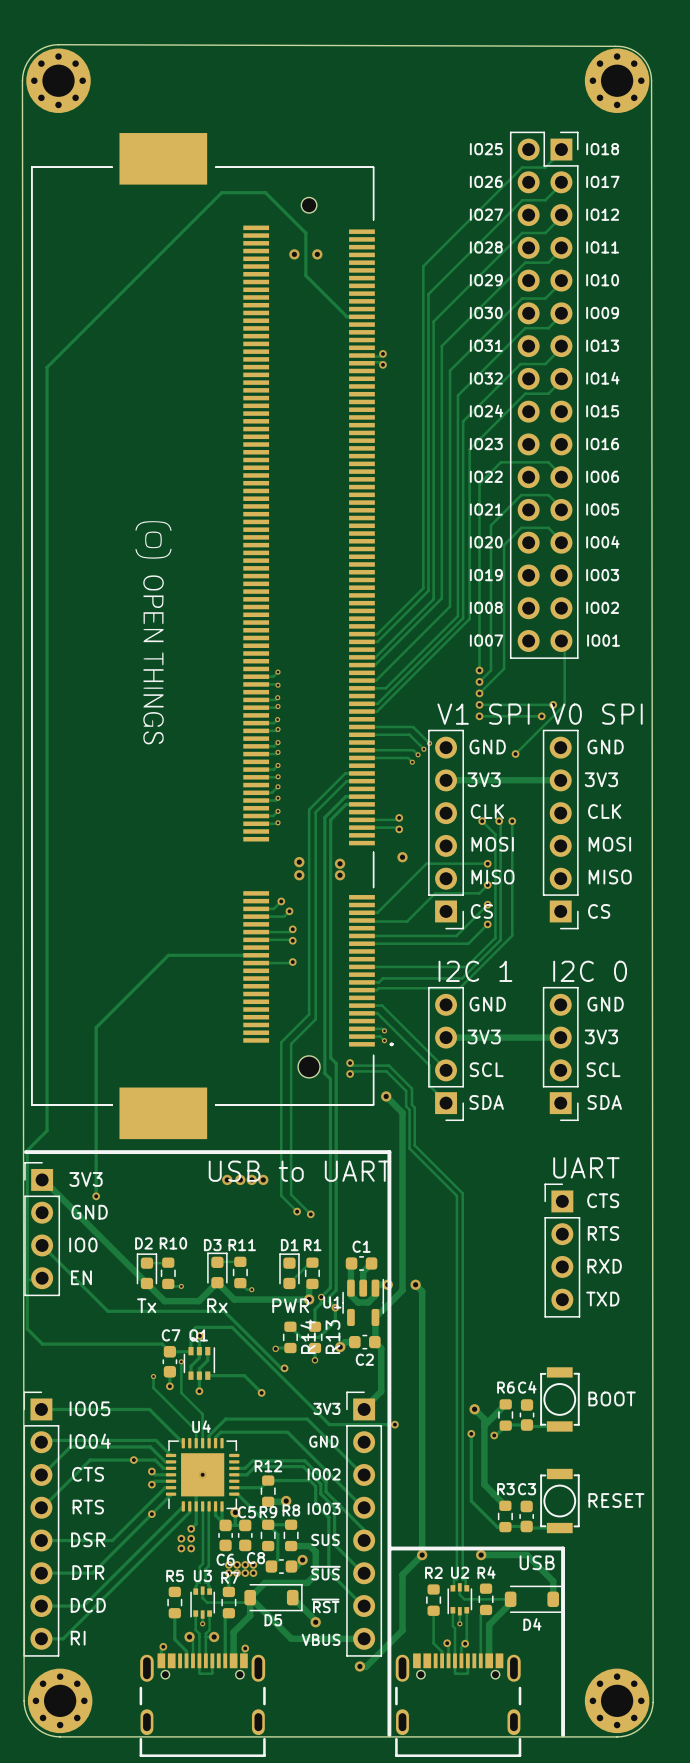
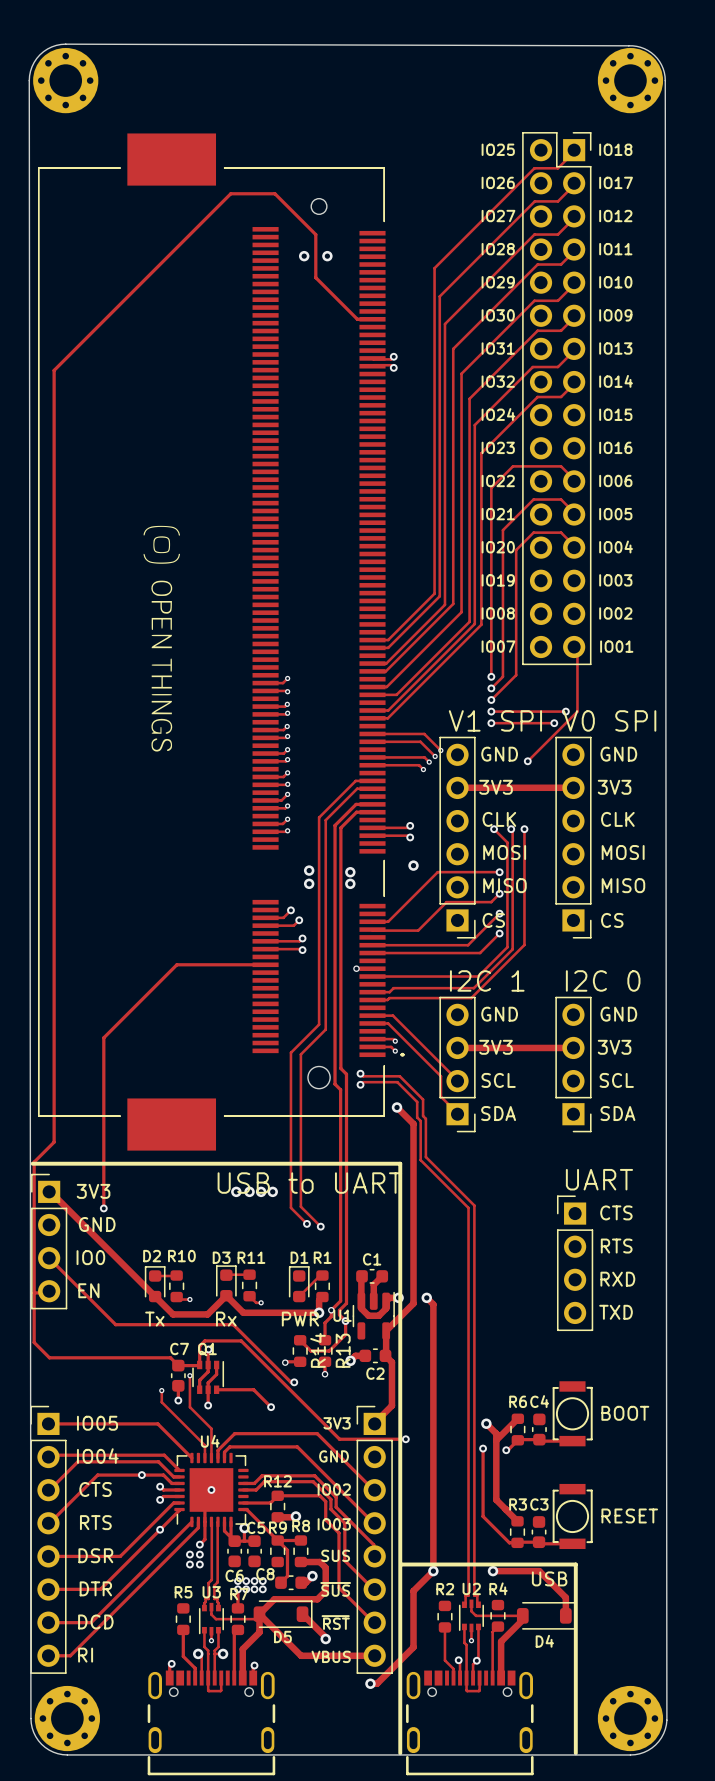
via: none -> (356, 968)
track: (292, 962) (256, 963) -> none
via: (292, 962) -> none

